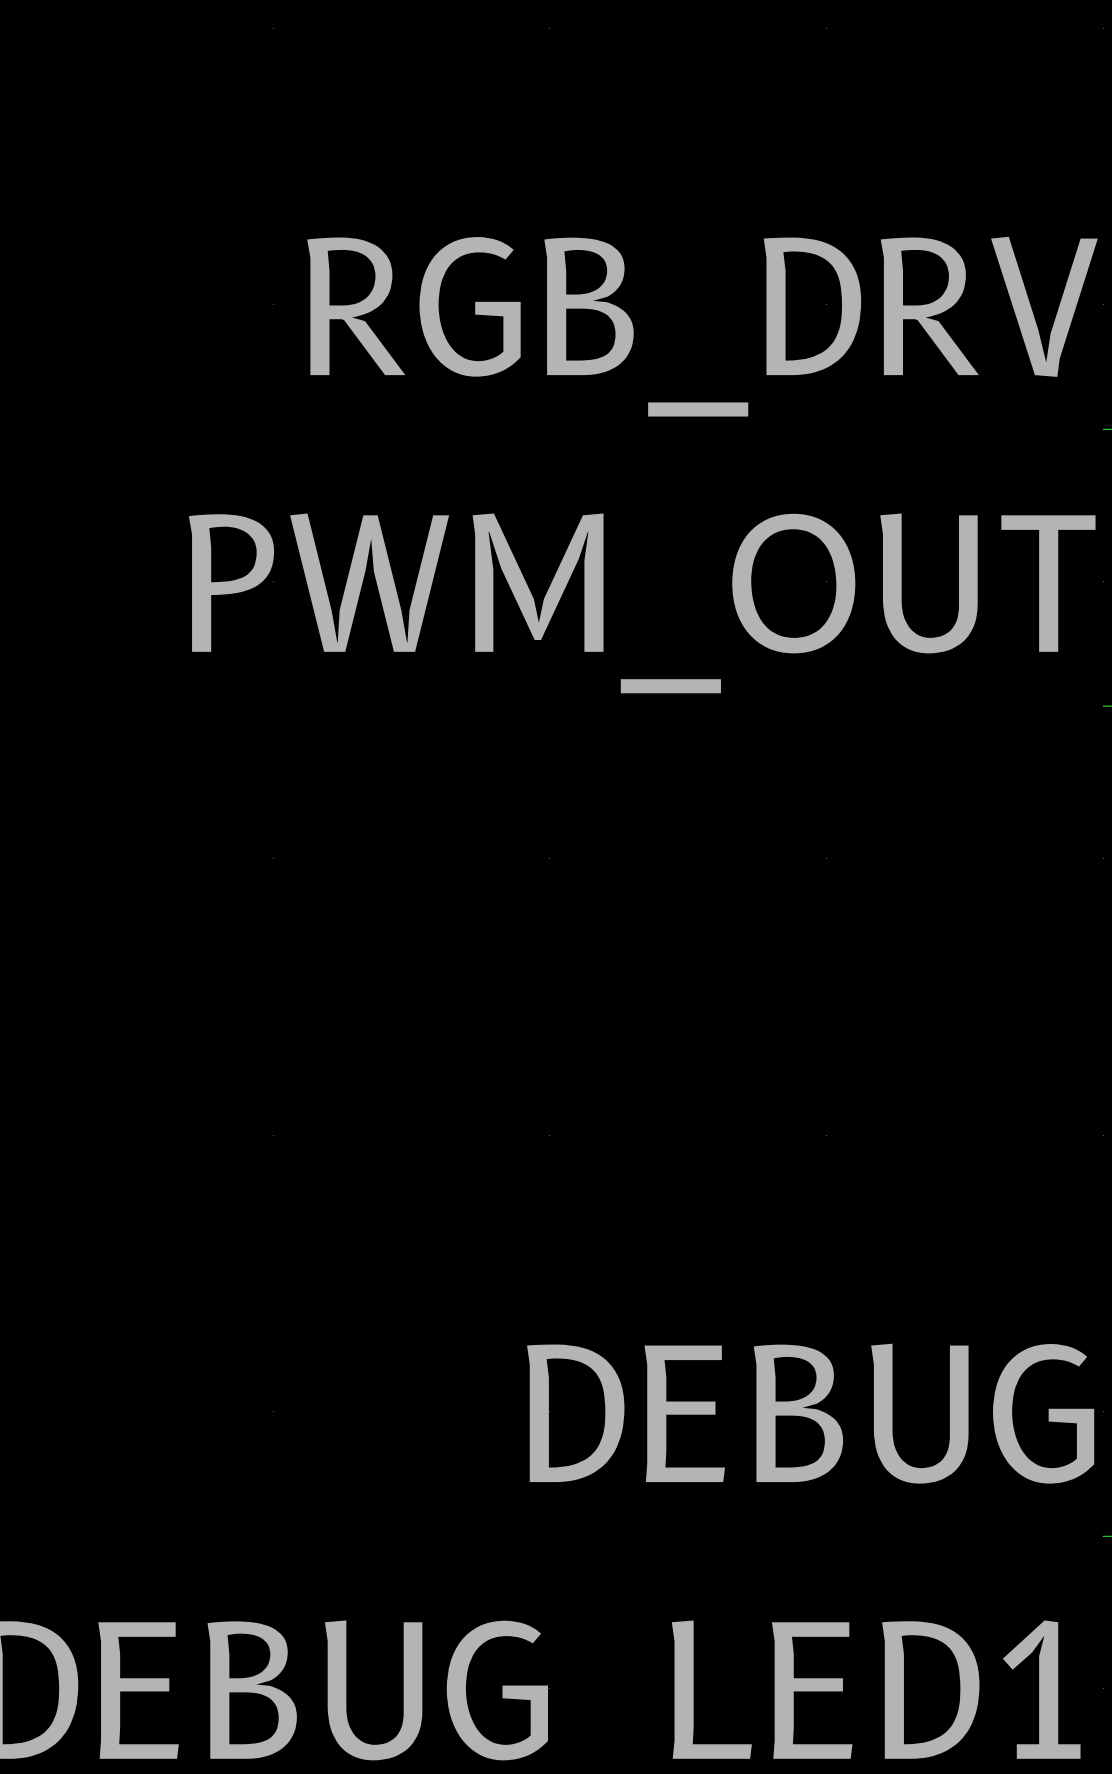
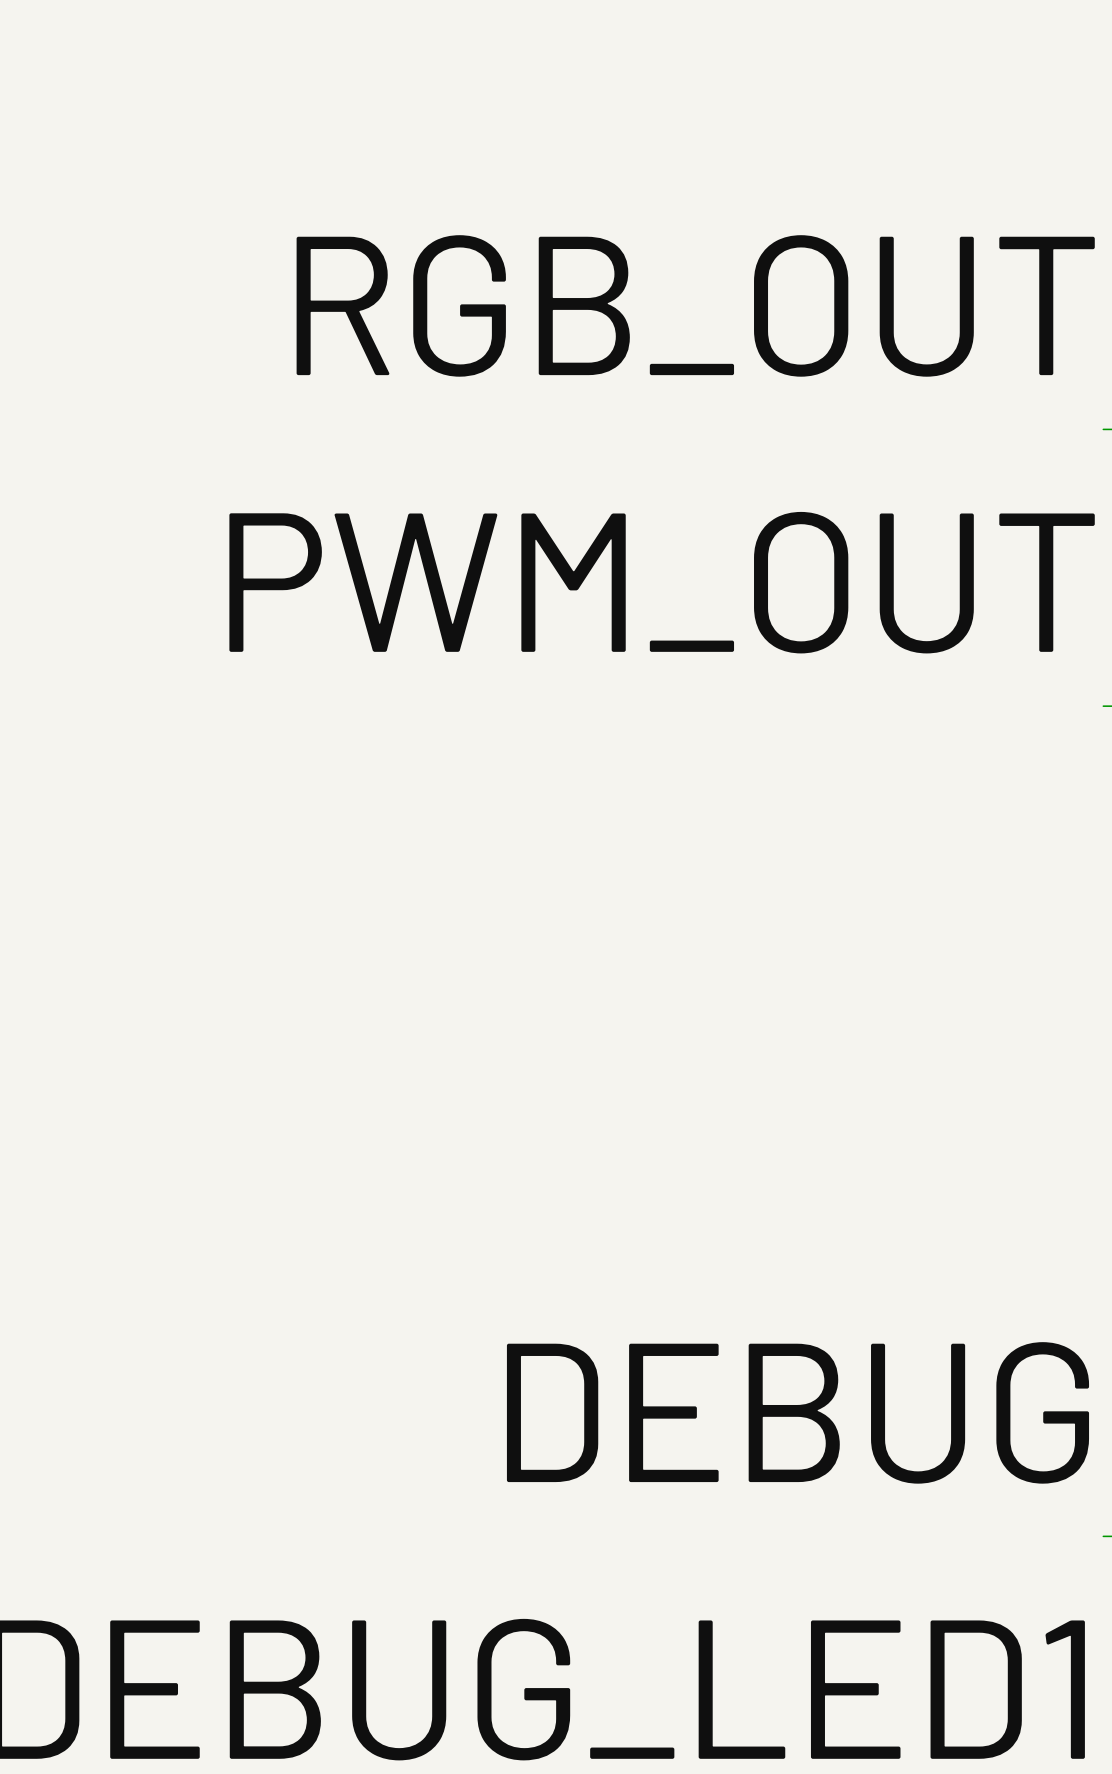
label: RGB_DRV (702, 326) -> RGB_OUT (695, 305)

